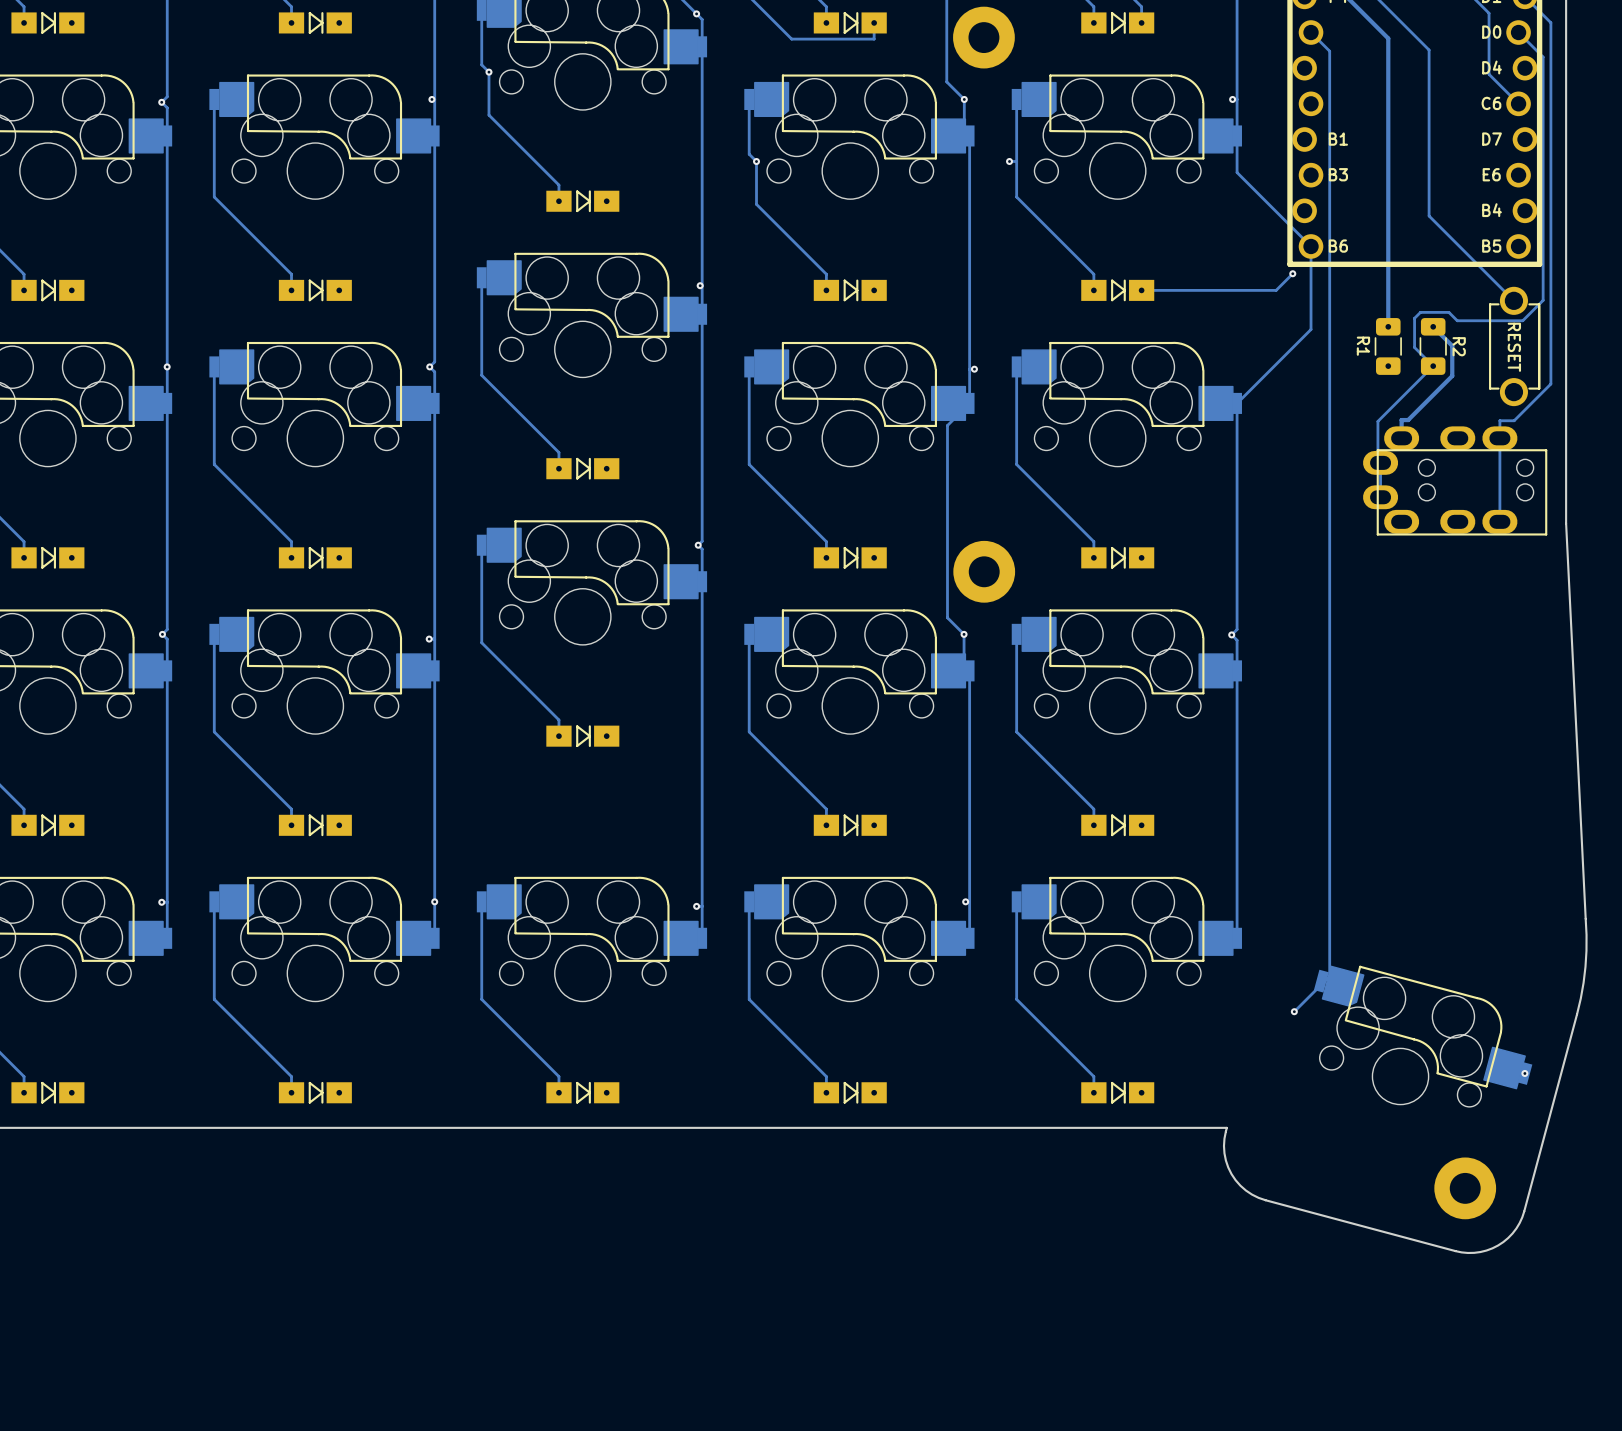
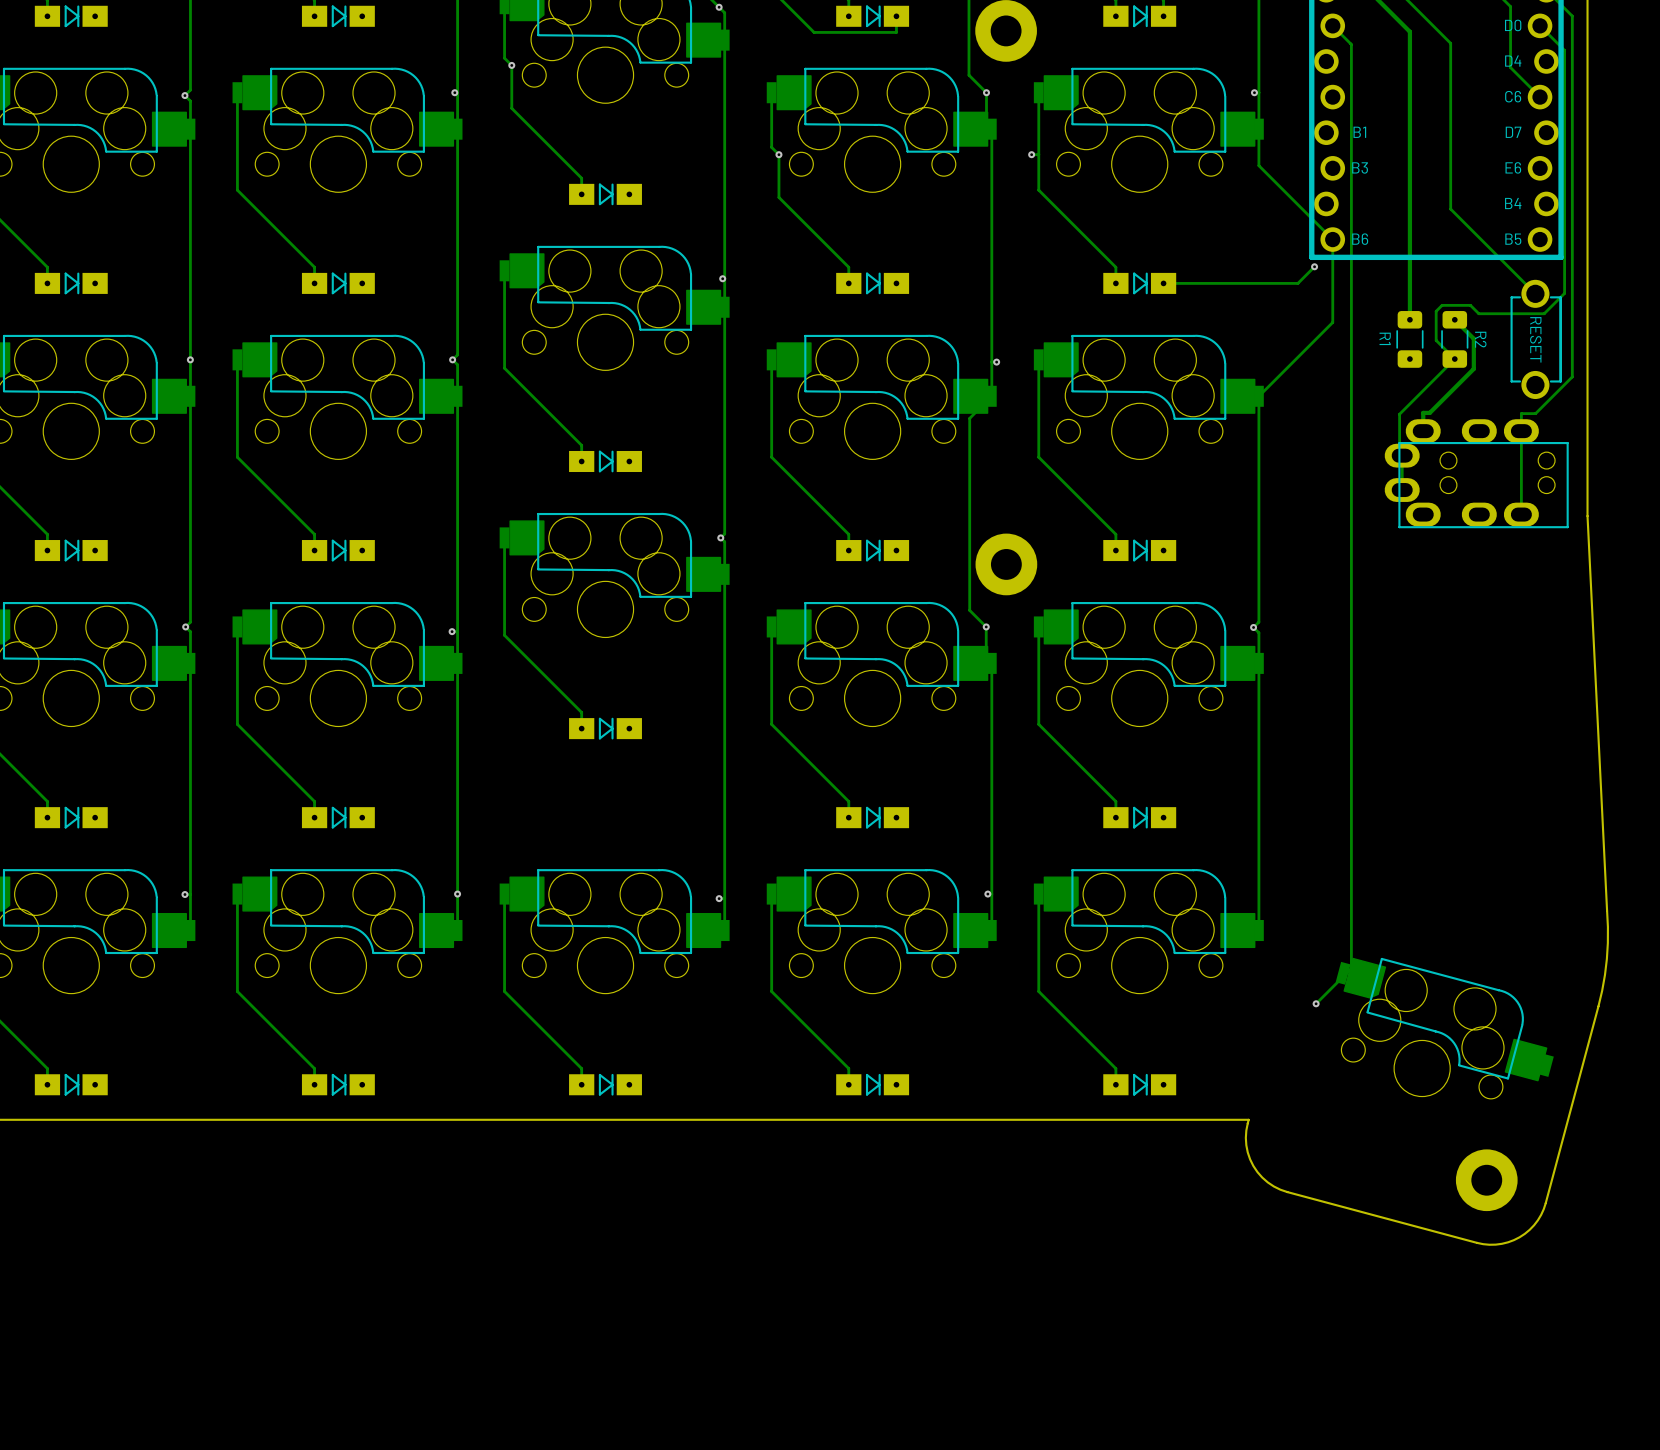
via: (1524, 1073) -> none

